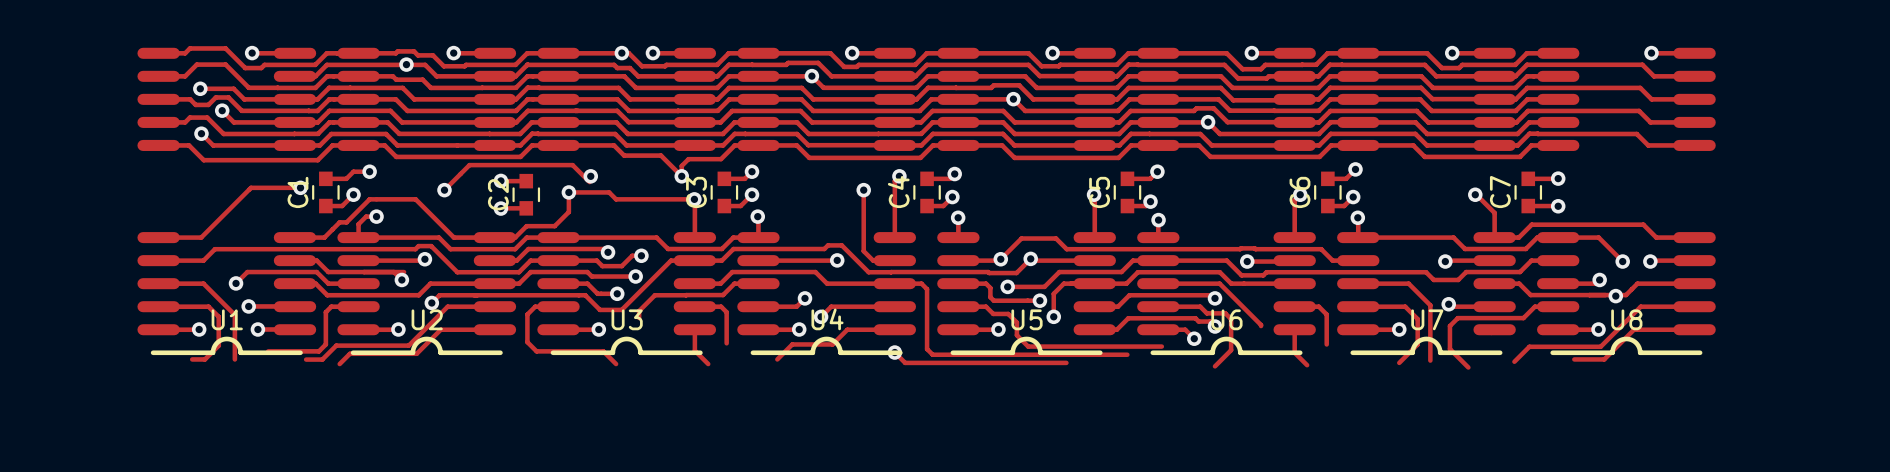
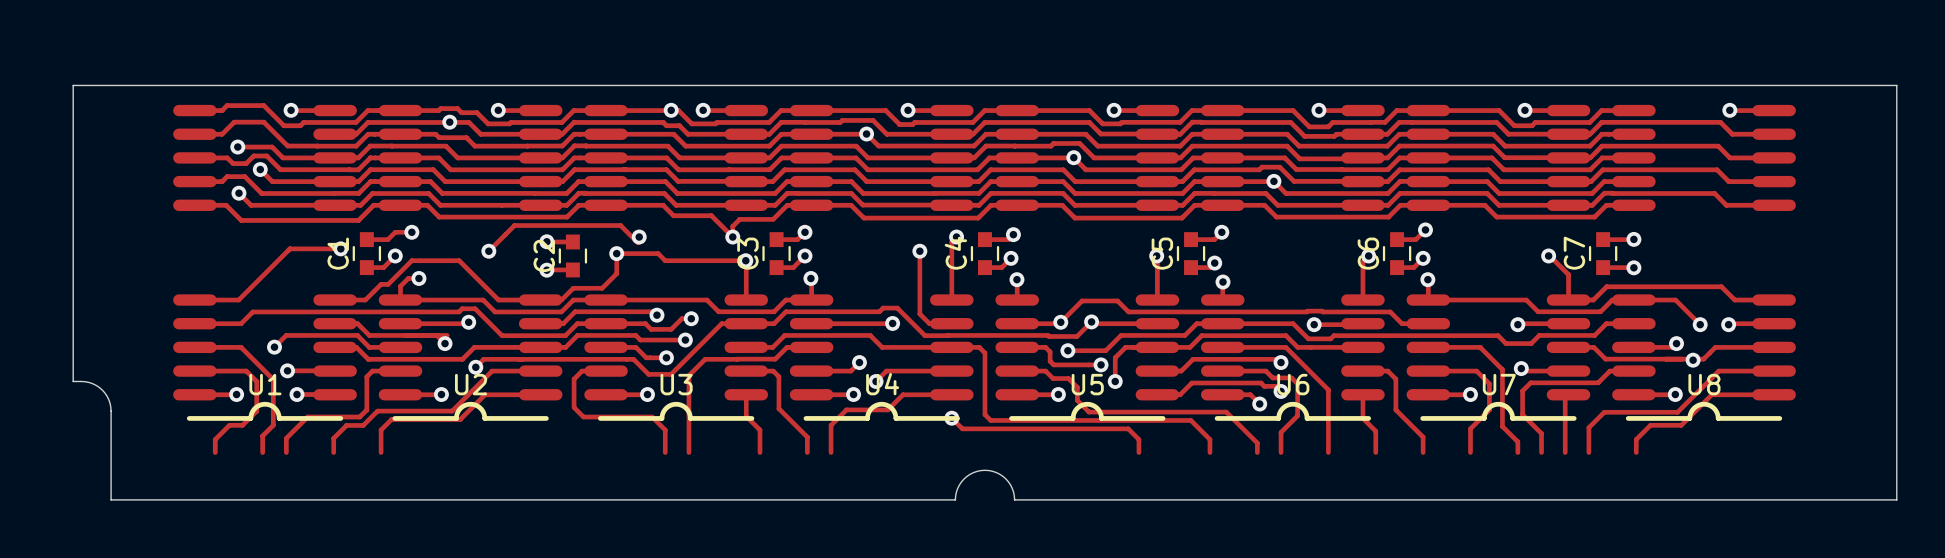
board edge: none -> (73, 85) (1896, 85) (1896, 499) (1014, 499) (1012, 488) (1005, 478) (996, 472) (984, 470) (973, 472) (964, 478) (957, 488) (955, 499) (111, 499) (110, 403) (104, 393) (96, 385) (85, 381) (73, 381) (73, 85)
track: none -> (688, 382) (688, 452)
track: none -> (1328, 390) (1328, 452)
track: none -> (1565, 398) (1565, 452)
track: none -> (778, 408) (807, 437) (807, 452)
track: none -> (1395, 409) (1423, 437) (1423, 452)
track: none -> (1226, 412) (1257, 443) (1257, 452)
track: none -> (307, 417) (286, 438) (286, 452)
track: none -> (1190, 420) (1209, 439) (1209, 452)
track: none -> (229, 425) (215, 439) (215, 452)
track: none -> (273, 425) (262, 435) (262, 452)
track: none -> (346, 425) (333, 438) (333, 452)
track: none -> (831, 425) (831, 452)
track: none -> (1650, 425) (1636, 439) (1636, 452)
track: none -> (1502, 426) (1517, 441) (1517, 452)
track: none -> (1588, 427) (1588, 452)
track: none -> (1128, 428) (1138, 439) (1138, 452)
track: none -> (1470, 428) (1470, 452)
track: none -> (381, 430) (381, 452)
track: none -> (665, 430) (665, 452)
track: none -> (760, 430) (760, 452)
track: none -> (1375, 431) (1375, 452)
track: none -> (1281, 432) (1281, 452)
track: none -> (1541, 433) (1541, 452)

